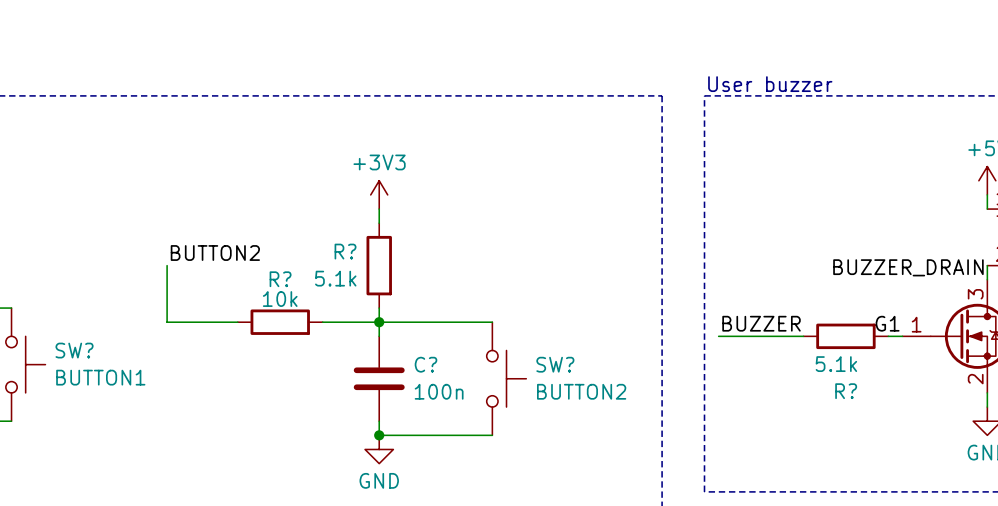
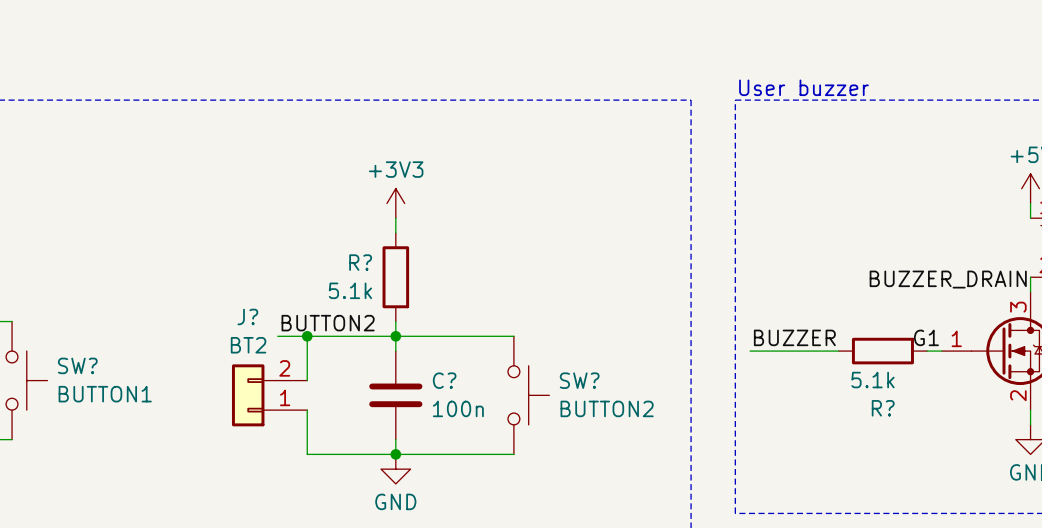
label position: BUTTON2 (215, 253) -> BUTTON2 (328, 323)
wire: (167, 265) (167, 322) (237, 322) -> none
wire: none -> (277, 336) (336, 336)
R?: 10k (280, 322) -> none
wire: none -> (307, 336) (307, 380)
junction: none -> (307, 336)
J?: none -> BT2 (269, 395)
wire: none -> (307, 410) (307, 454) (395, 454)

